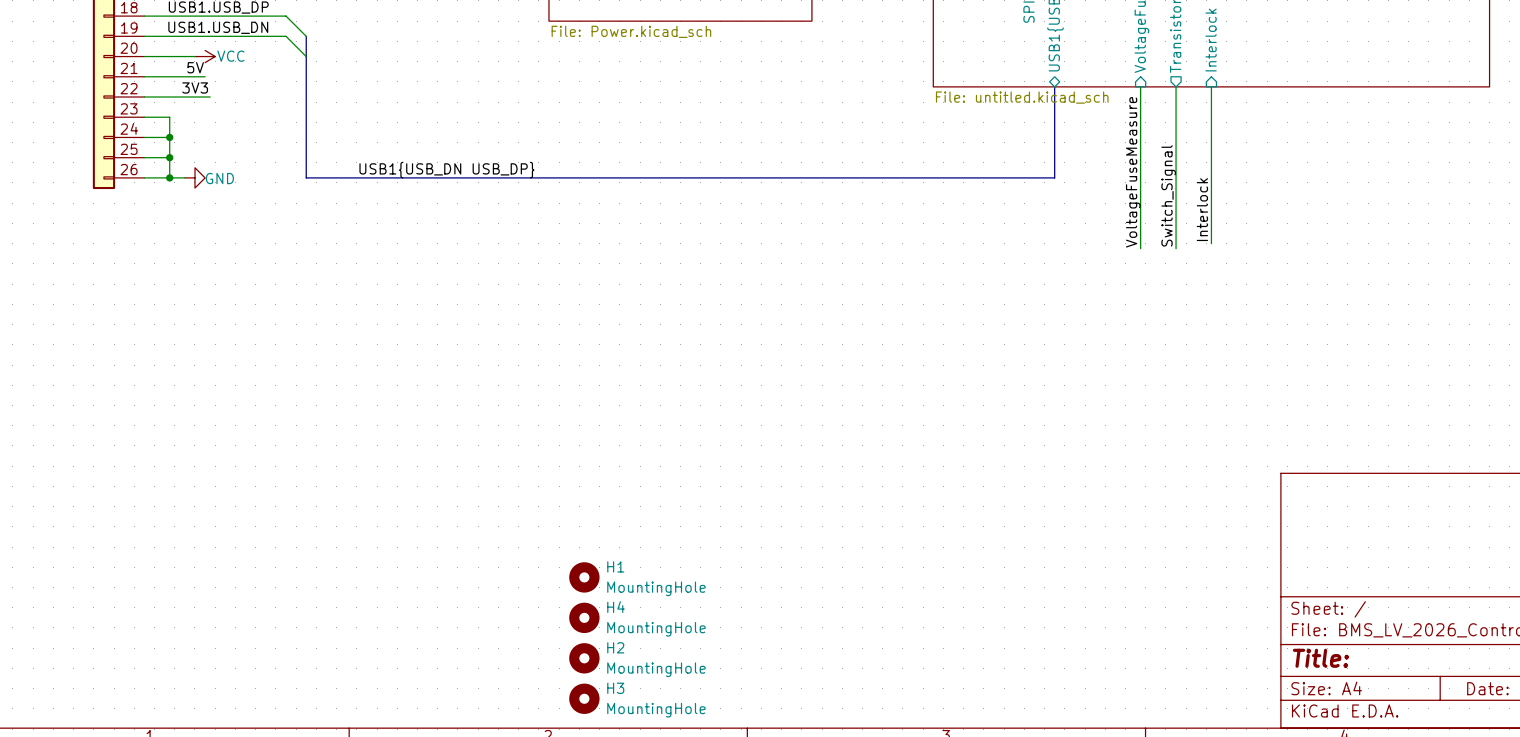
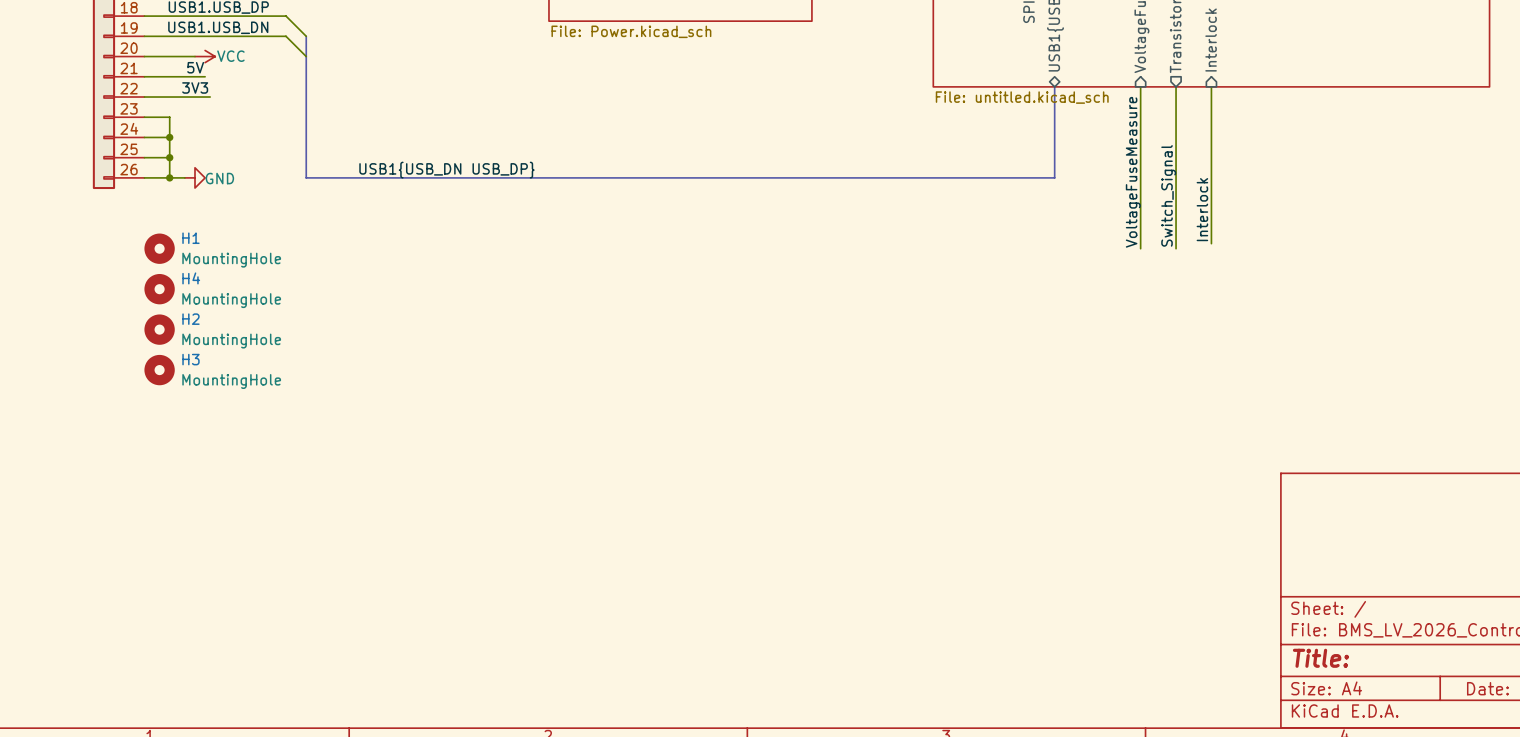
H1 position: (584, 577) -> (159, 248)
H4 position: (584, 617) -> (159, 289)
H2 position: (584, 658) -> (159, 329)
H3 position: (584, 698) -> (159, 370)

